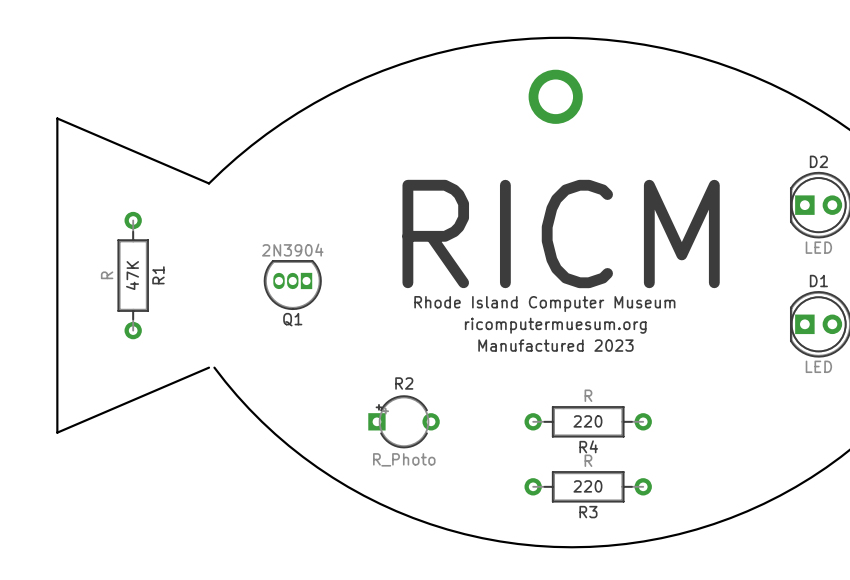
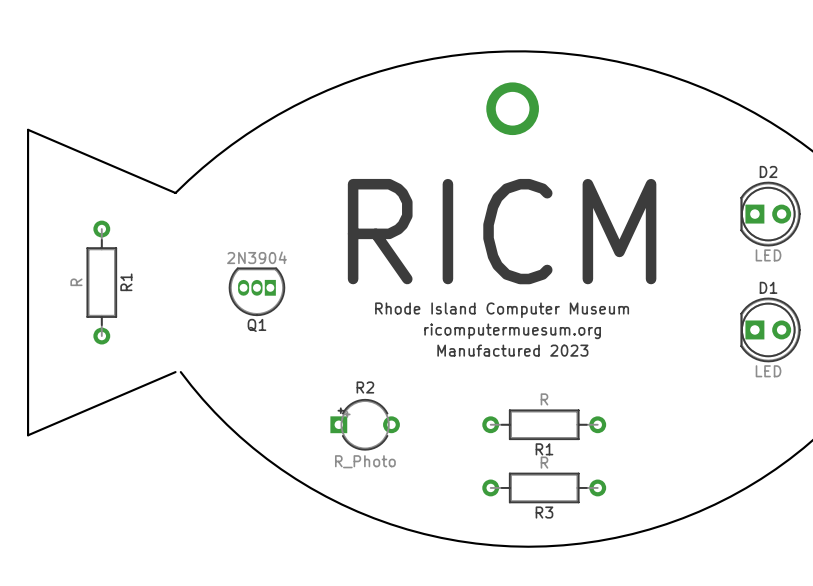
text position: RICM (561, 234) -> RICM (502, 231)
text: 47K (132, 275) -> none
text: 220 (587, 421) -> none
R4 name: R4 (588, 446) -> R1 (544, 449)
text: 220 (587, 486) -> none

